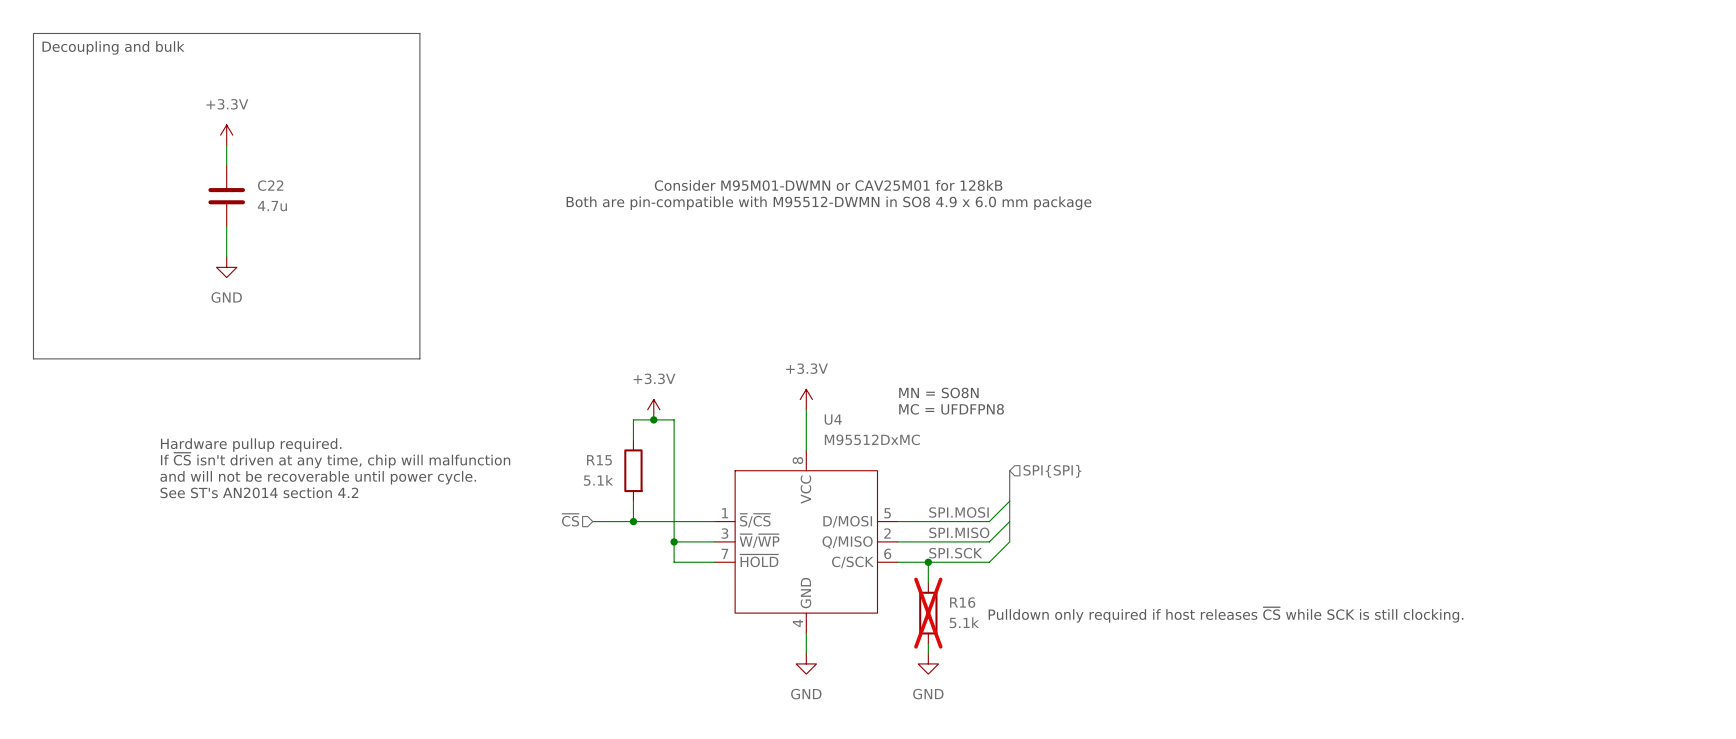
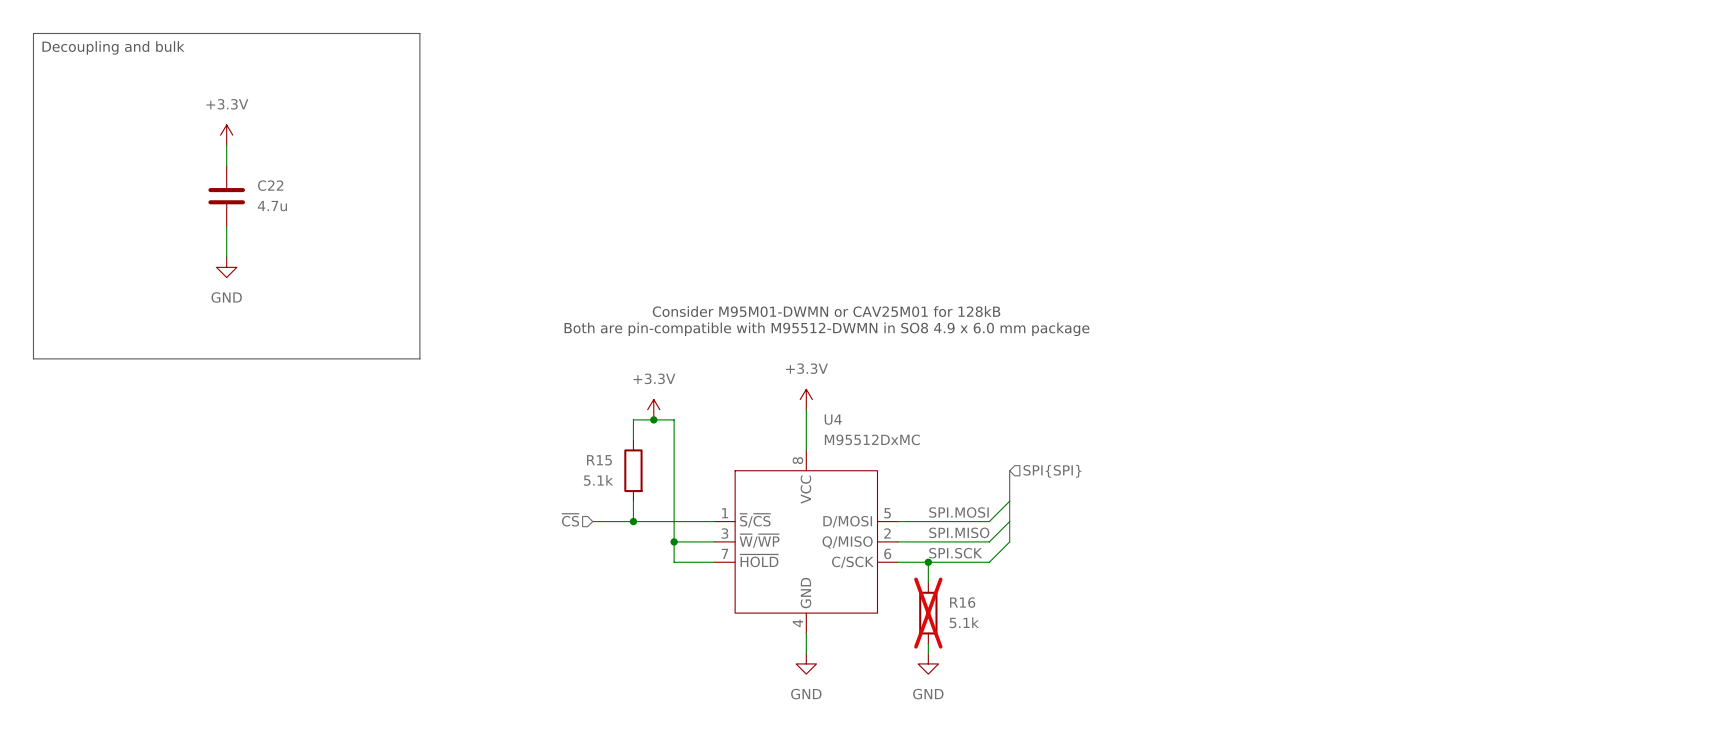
text position: Consider M95M01-DWMN or CAV25M01 for 128kB (828, 185) -> Consider M95M01-DWMN or CAV25M01 for 128kB (826, 311)
text position: Both are pin-compatible with M95512-DWMN in SO8 4.9 x 6.0 mm package (829, 203) -> Both are pin-compatible with M95512-DWMN in SO8 4.9 x 6.0 mm package (826, 329)
text: MN = SO8N (938, 392) -> none
text: MC = UFDFPN8 (951, 409) -> none
text: Hardware pullup required. (251, 445) -> none
text: If ~{CS} isn't driven at any time, chip will malfunction (335, 460) -> none
text: and will not be recoverable until power cycle. (318, 477) -> none
text: See ST's AN2014 section 4.2 (259, 492) -> none
text: Pulldown only required if host releases ~{CS} while SCK is still clocking. (1226, 614) -> none

